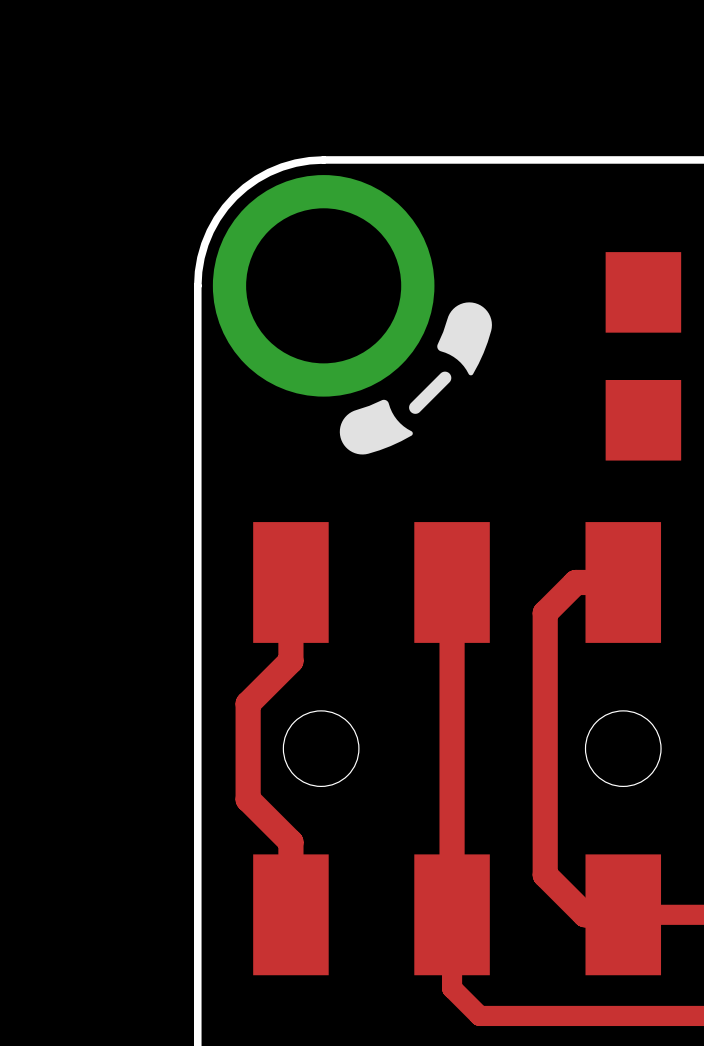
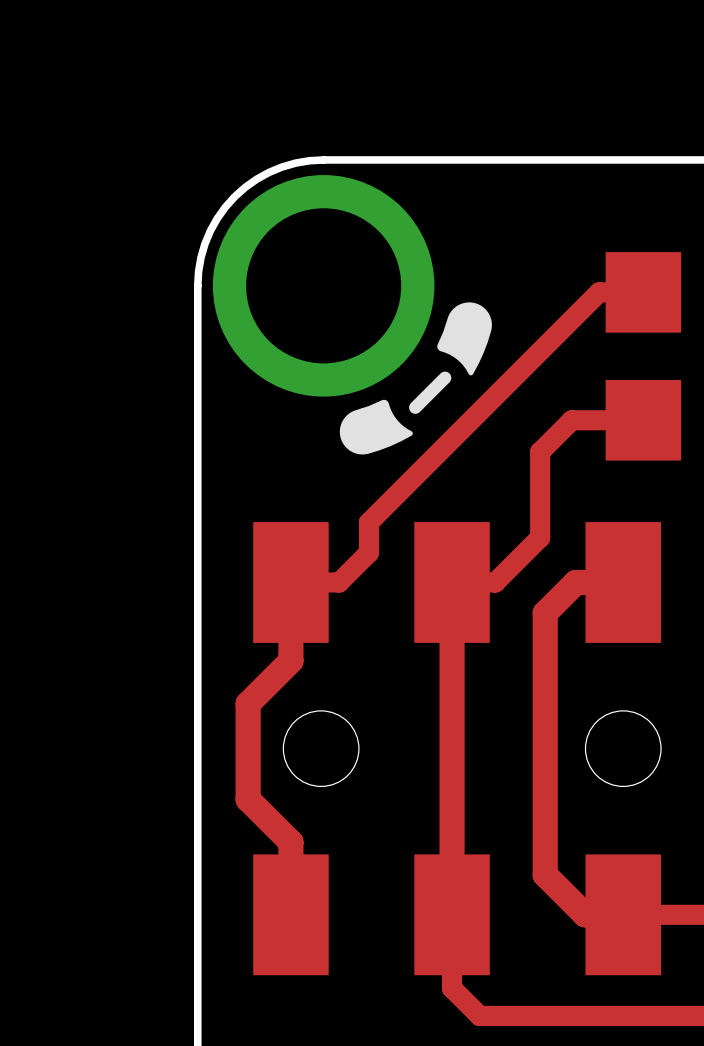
top track: none -> (643, 292) (599, 292) (368, 522) (368, 552) (339, 582) (290, 582)
top track: none -> (643, 420) (571, 420) (540, 452) (540, 537) (495, 582) (452, 582)

